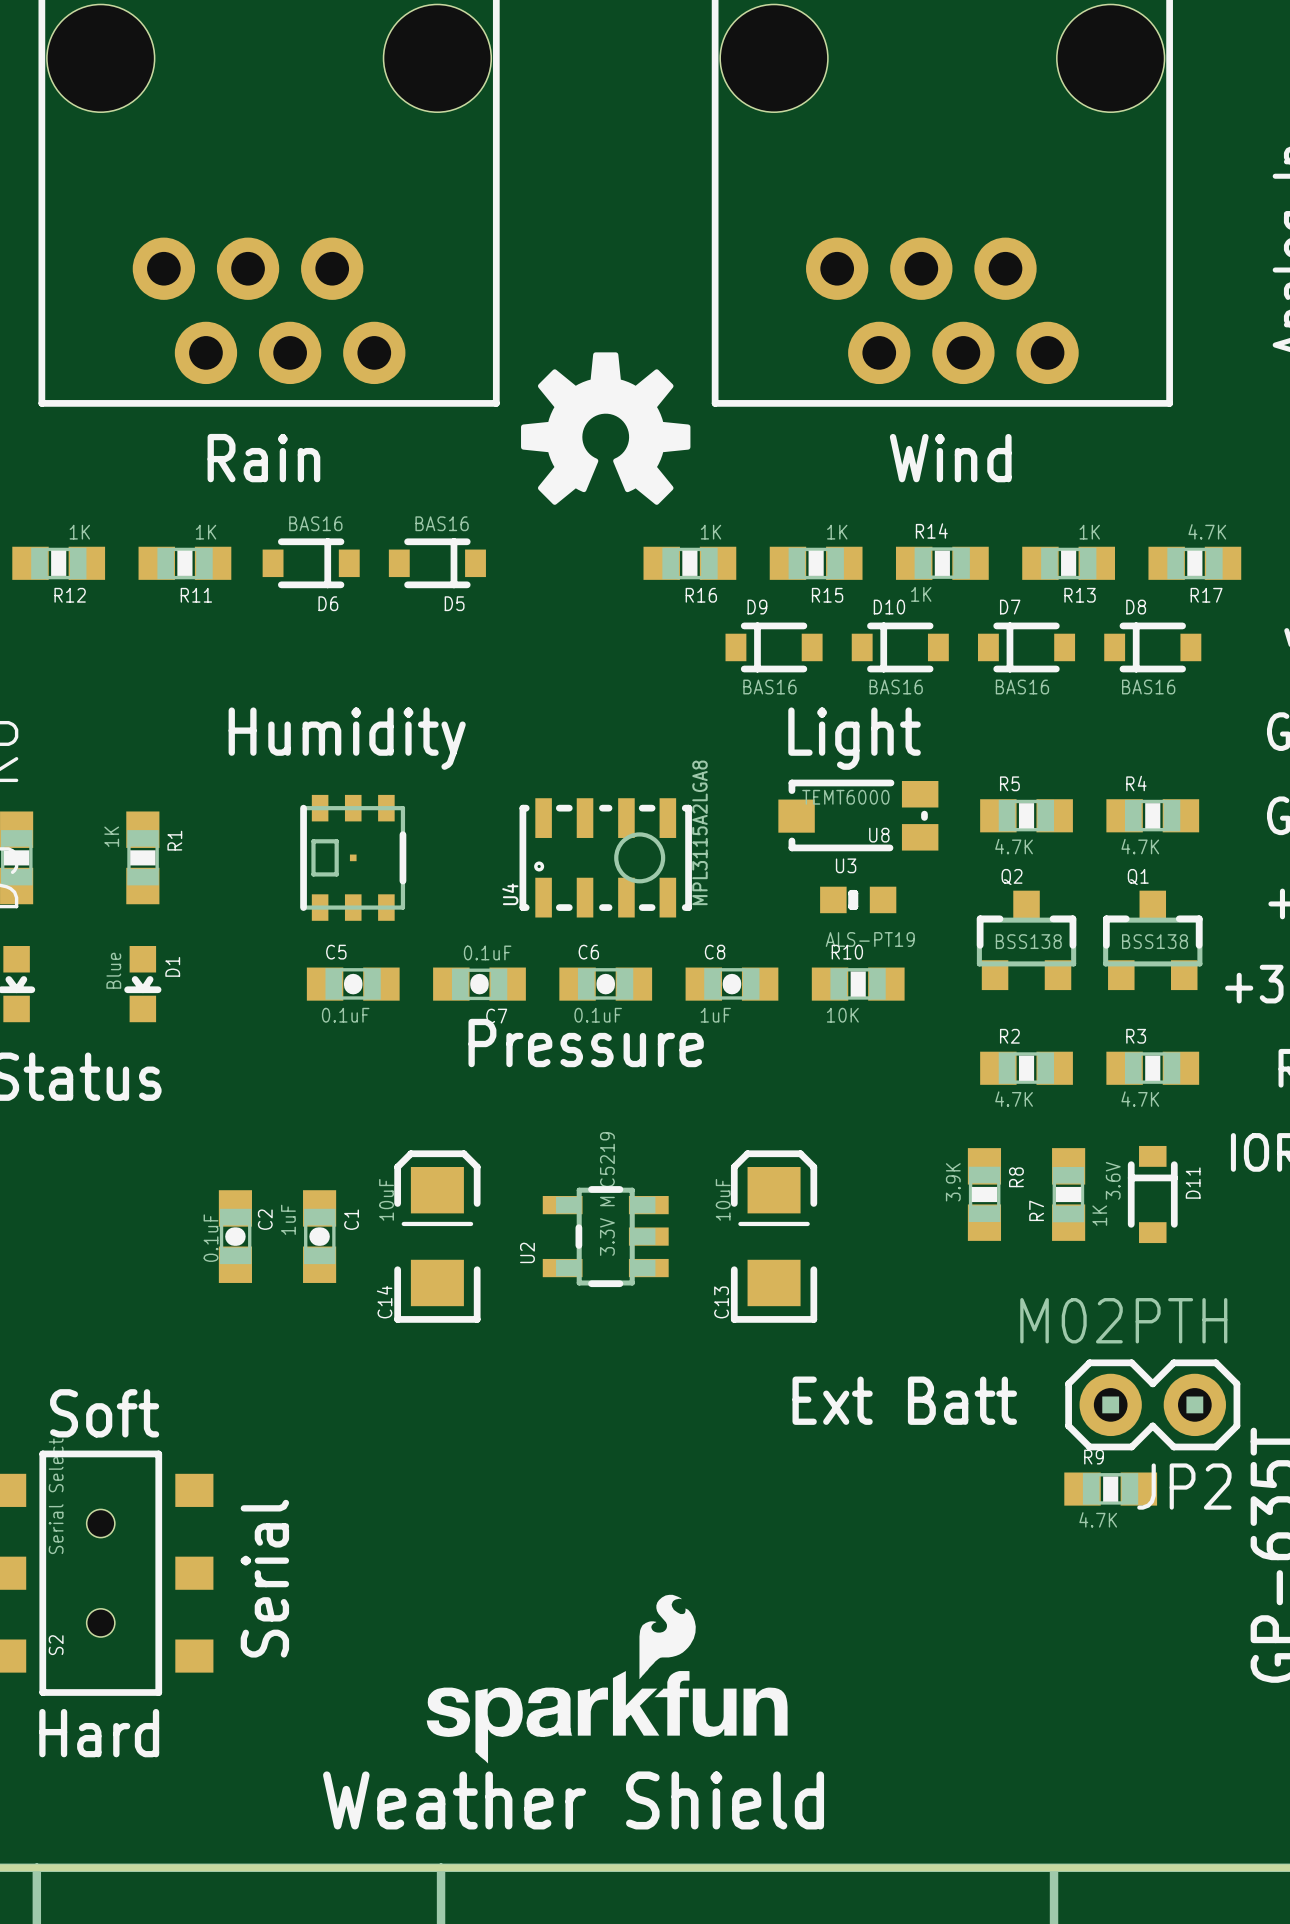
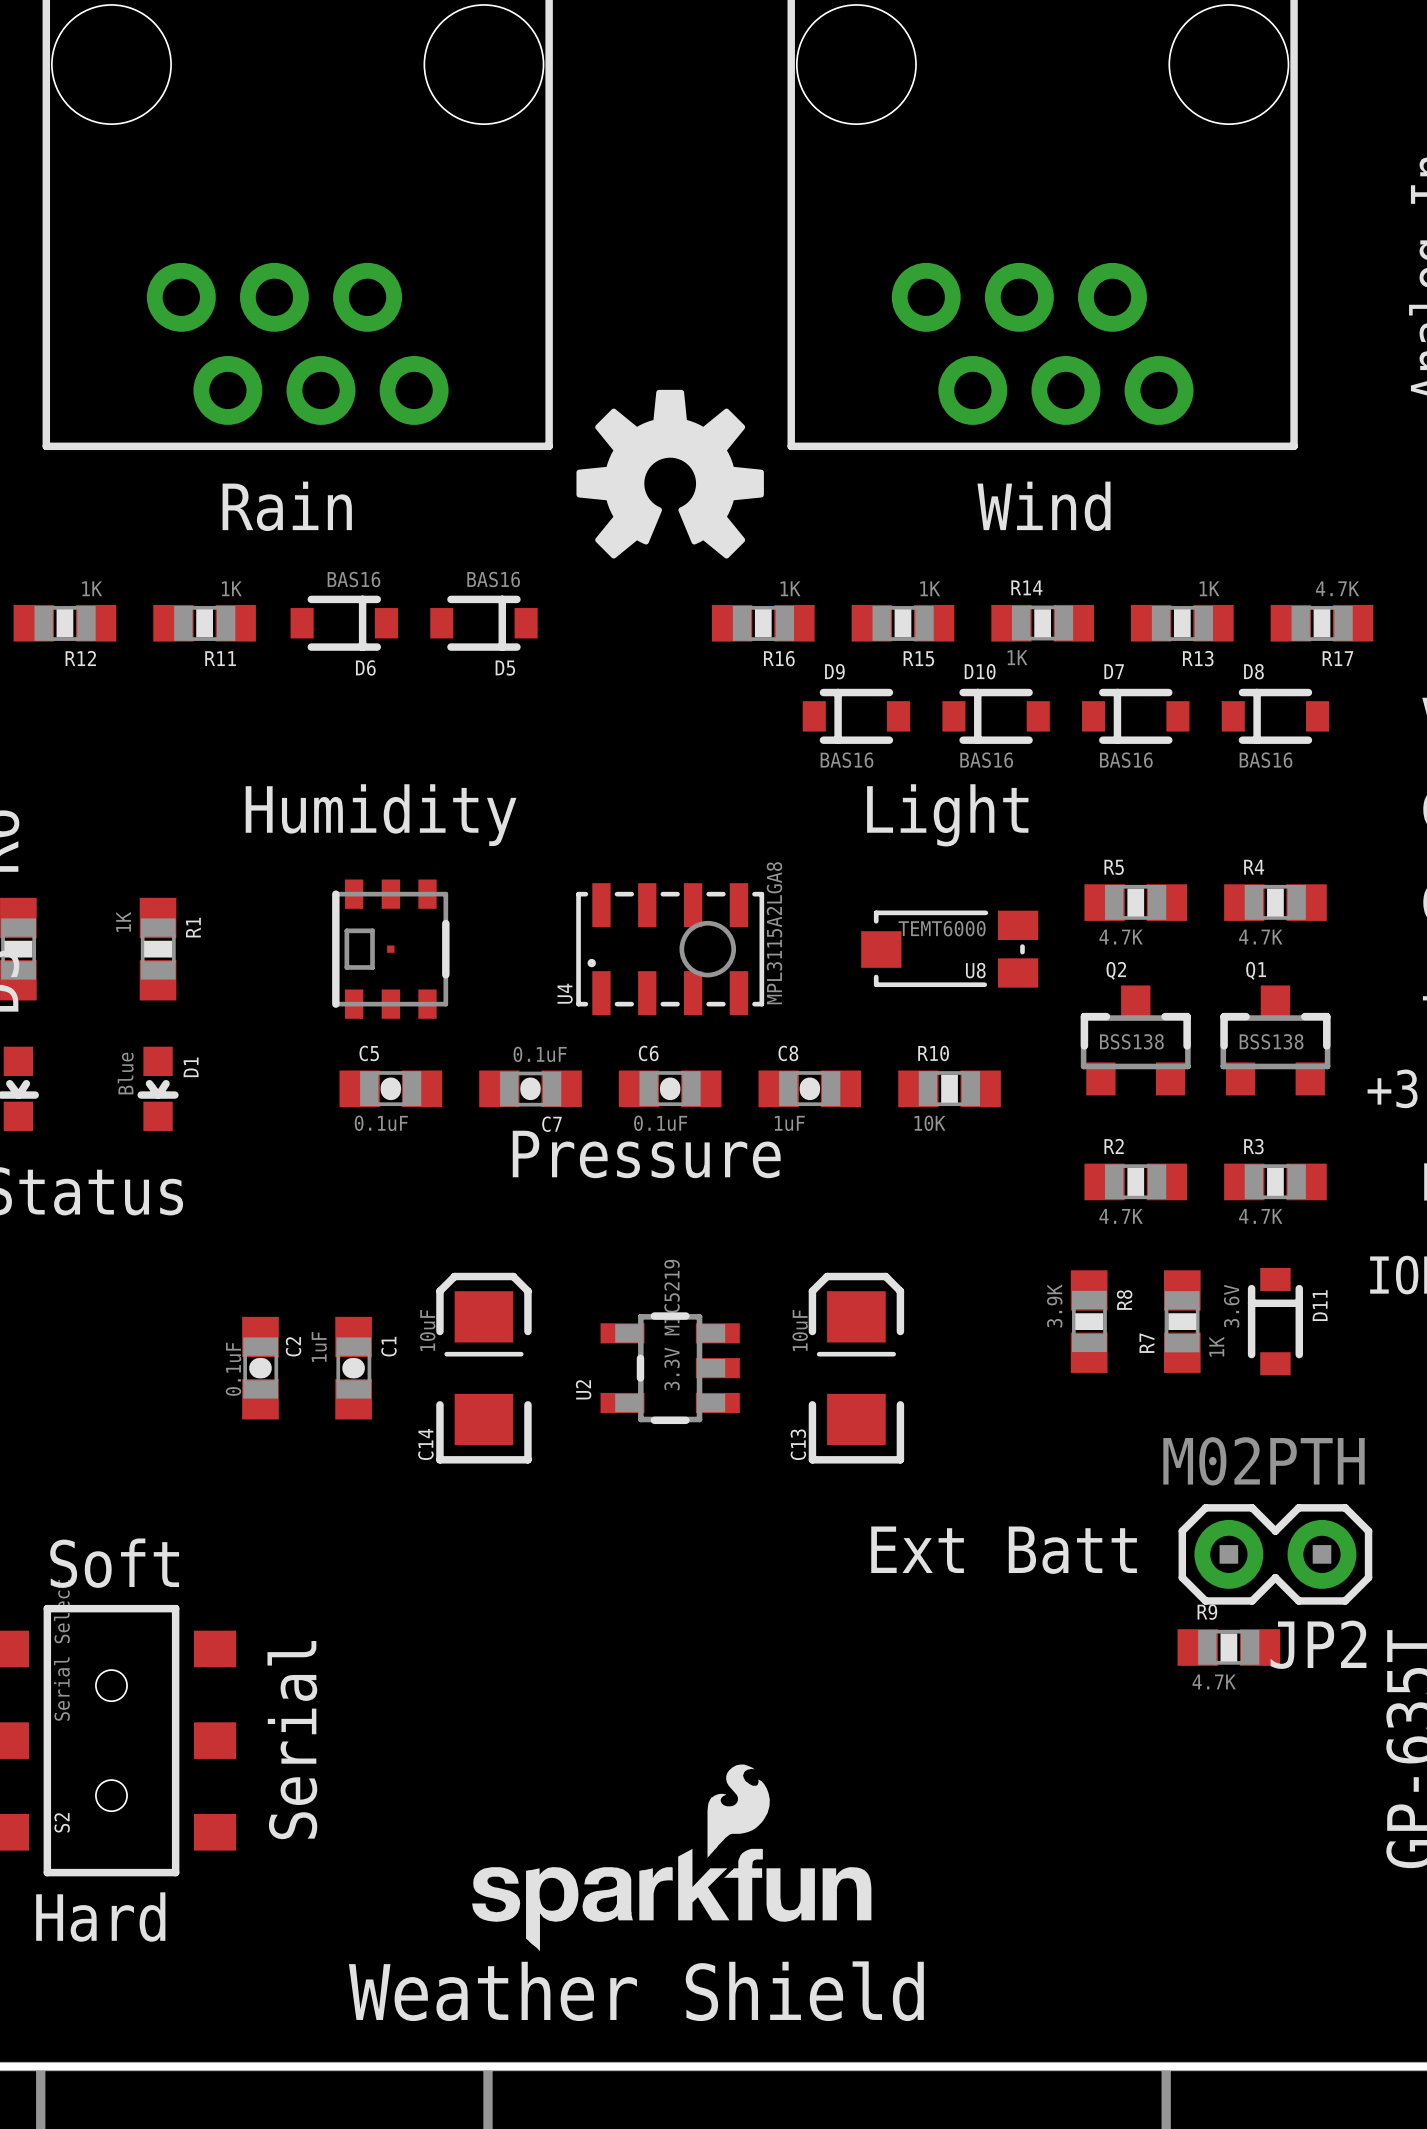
U8 footprint: [778, 779, 939, 852] -> [861, 910, 1039, 988]
U4 footprint: [519, 798, 692, 918] -> [576, 883, 765, 1016]
U3: ALS-PT19 (858, 899) -> none

